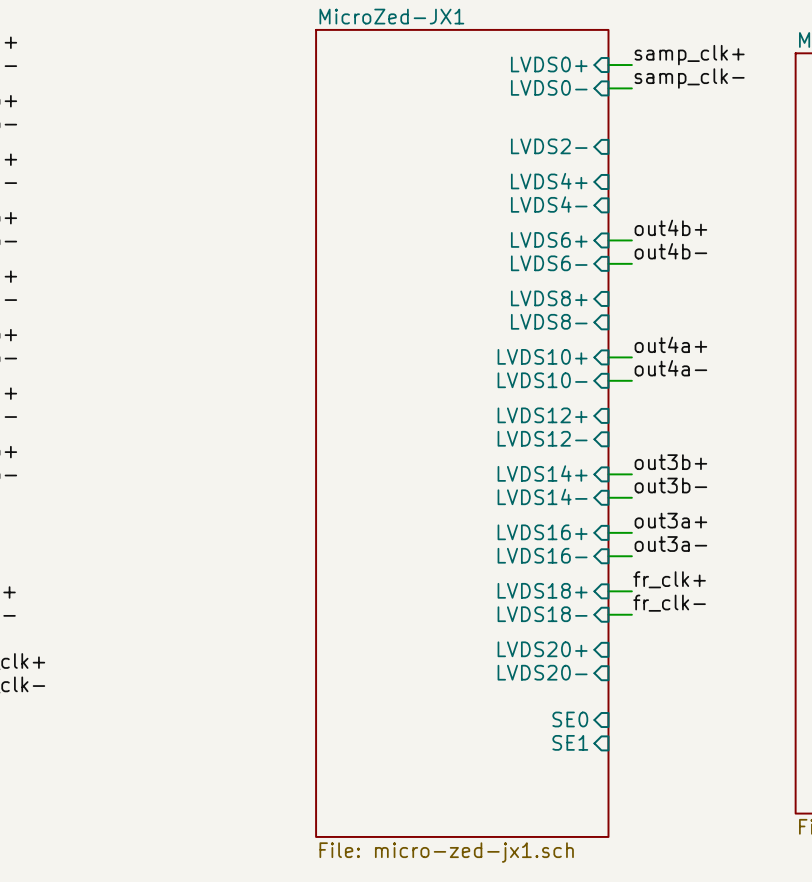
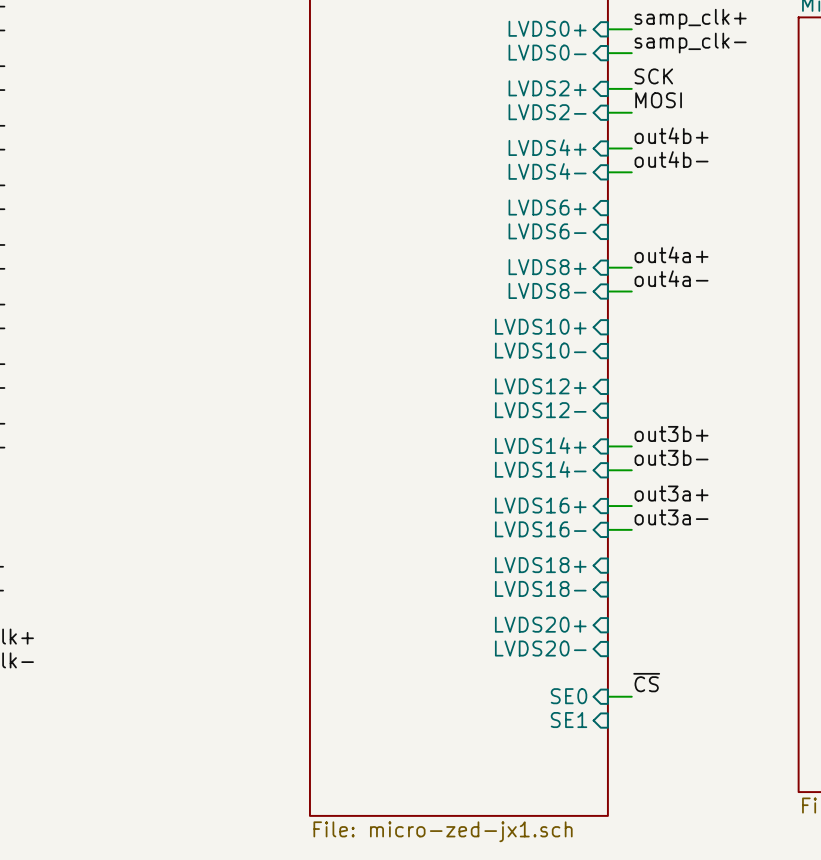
label: none -> SCK (653, 76)
sheet pin: none -> LVDS2+ (547, 88)
wire: none -> (607, 88) (631, 88)
label: none -> MOSI (658, 100)
wire: none -> (607, 112) (631, 112)
label position: out4b+ (670, 227) -> out4b+ (671, 135)
wire: (608, 240) (631, 240) -> (607, 148) (631, 148)
label position: out4b- (670, 251) -> out4b- (671, 159)
wire: (608, 263) (631, 263) -> (607, 172) (631, 172)
label position: out4a+ (670, 344) -> out4a+ (671, 254)
wire: (608, 357) (631, 357) -> (607, 267) (631, 267)
label position: out4a- (670, 368) -> out4a- (671, 278)
wire: (608, 380) (631, 380) -> (607, 291) (631, 291)
label: fr_clk+ (669, 579) -> none
wire: (608, 591) (631, 591) -> none
label: fr_clk- (669, 603) -> none
wire: (608, 614) (631, 614) -> (607, 696) (631, 696)
label: none -> ~{CS} (646, 682)

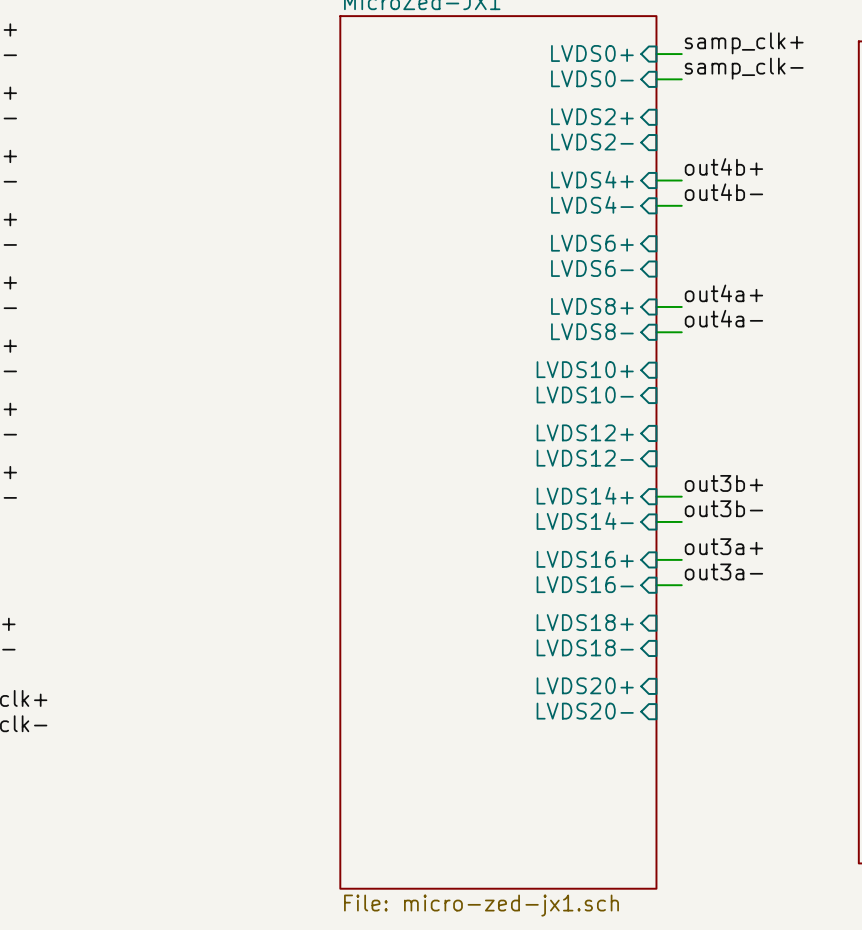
label: SCK (653, 76) -> none
wire: (607, 88) (631, 88) -> none
label: MOSI (658, 100) -> none
wire: (607, 112) (631, 112) -> none
label: ~{CS} (646, 682) -> none
sheet pin: SE0 (569, 696) -> none
wire: (607, 696) (631, 696) -> none
sheet pin: SE1 (569, 720) -> none

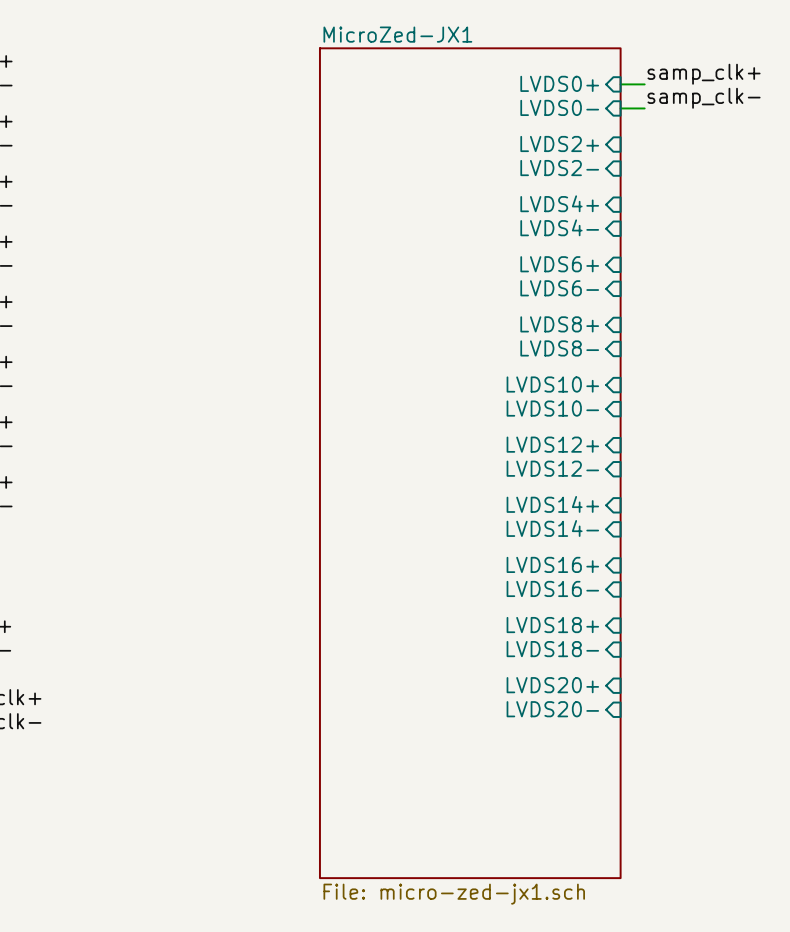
label: out4b+ (723, 166) -> none
wire: (656, 180) (681, 180) -> none
label: out4b- (723, 192) -> none
wire: (656, 205) (681, 205) -> none
label: out4a+ (723, 293) -> none
wire: (656, 306) (681, 306) -> none
label: out4a- (723, 318) -> none
wire: (656, 332) (681, 332) -> none
label: out3b+ (723, 483) -> none
wire: (656, 496) (681, 496) -> none
label: out3b- (723, 508) -> none
wire: (656, 521) (681, 521) -> none
label: out3a+ (723, 546) -> none
wire: (656, 559) (681, 559) -> none
label: out3a- (723, 571) -> none
wire: (656, 585) (681, 585) -> none

